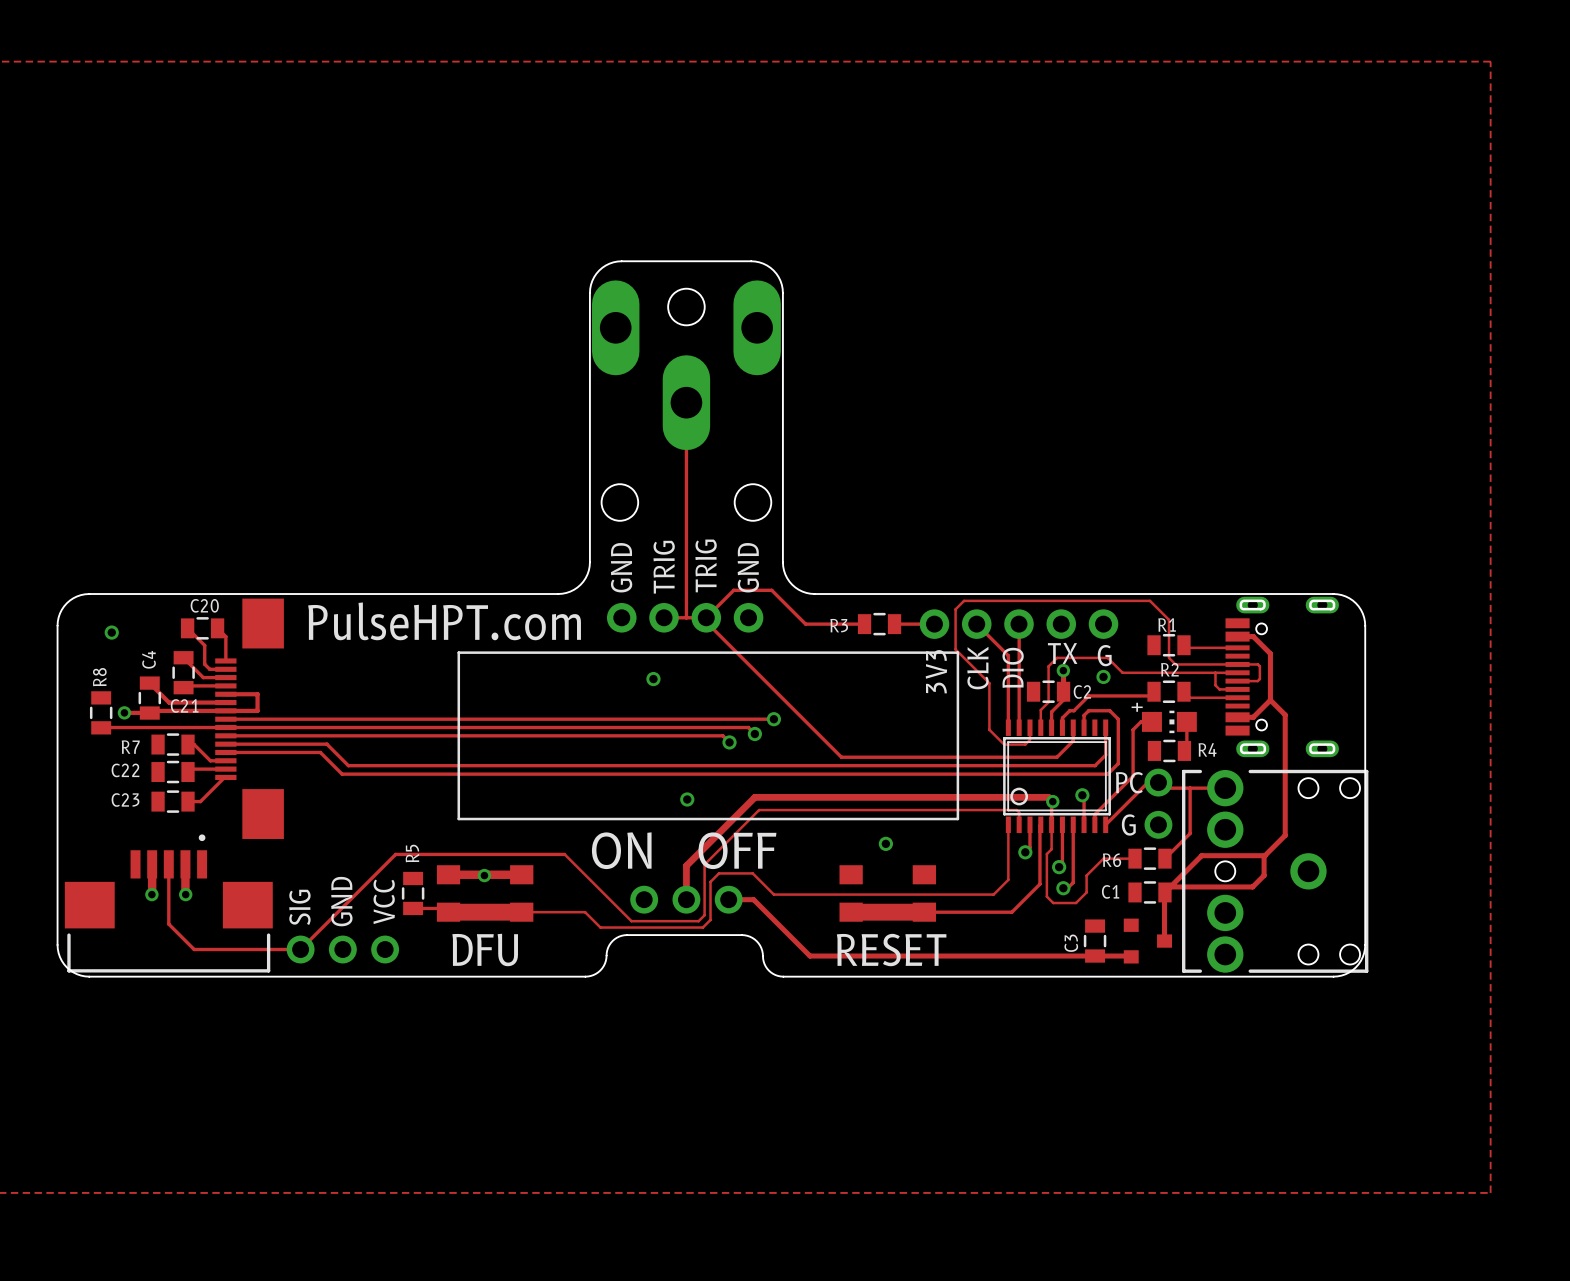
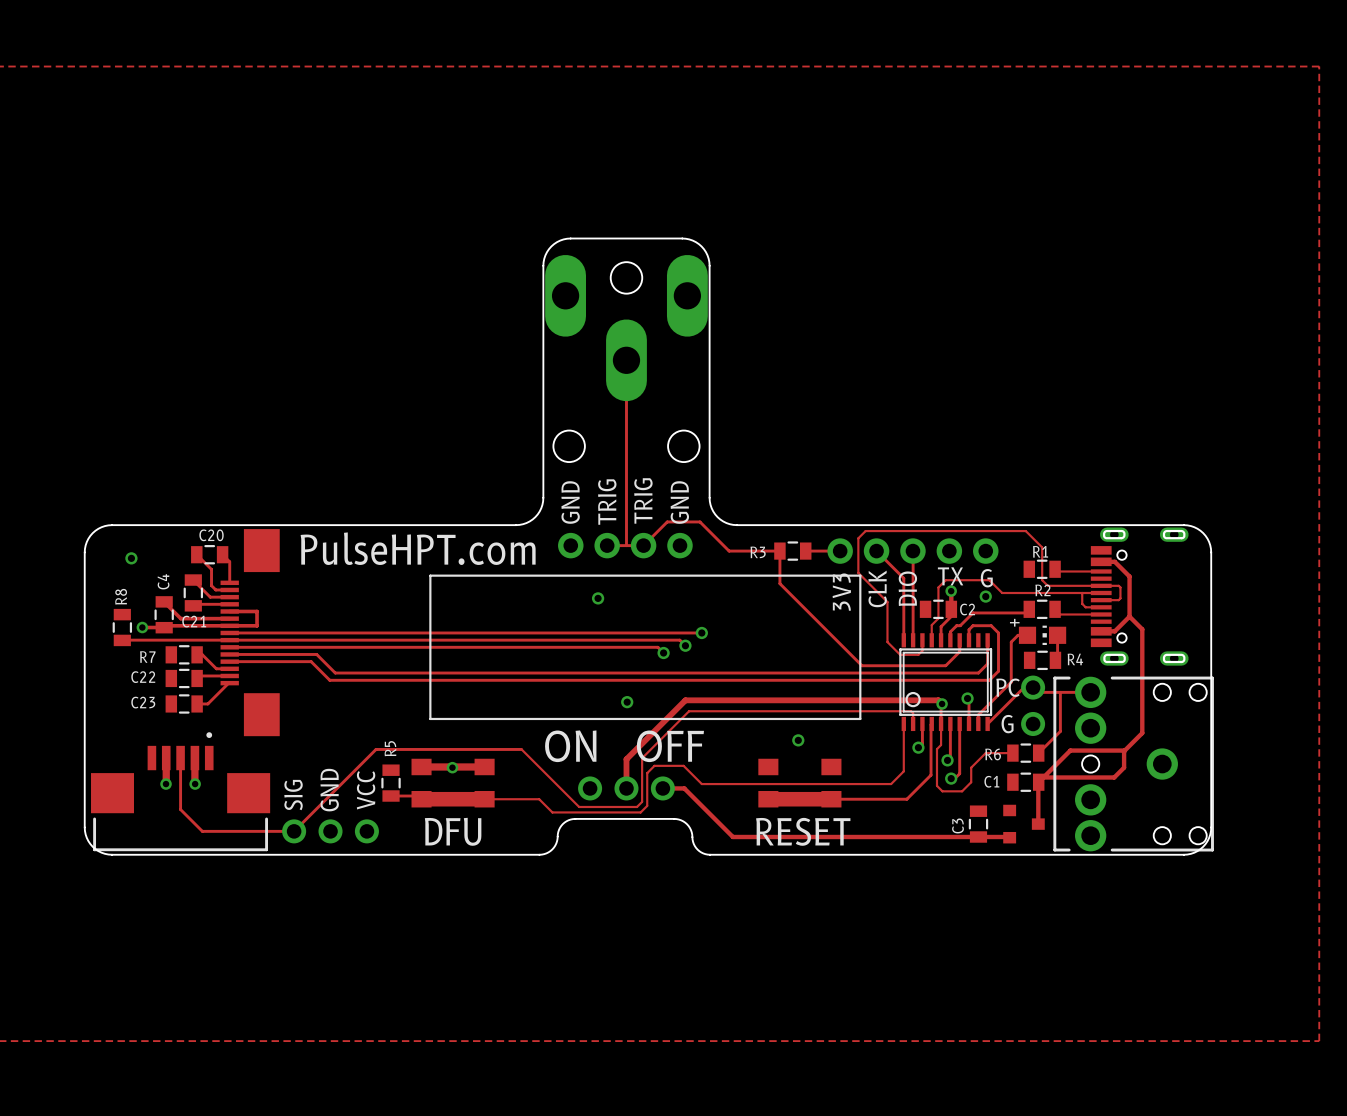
track: (706, 617) (706, 622) (841, 757) (959, 757) -> (779, 551) (779, 583) (862, 665)

